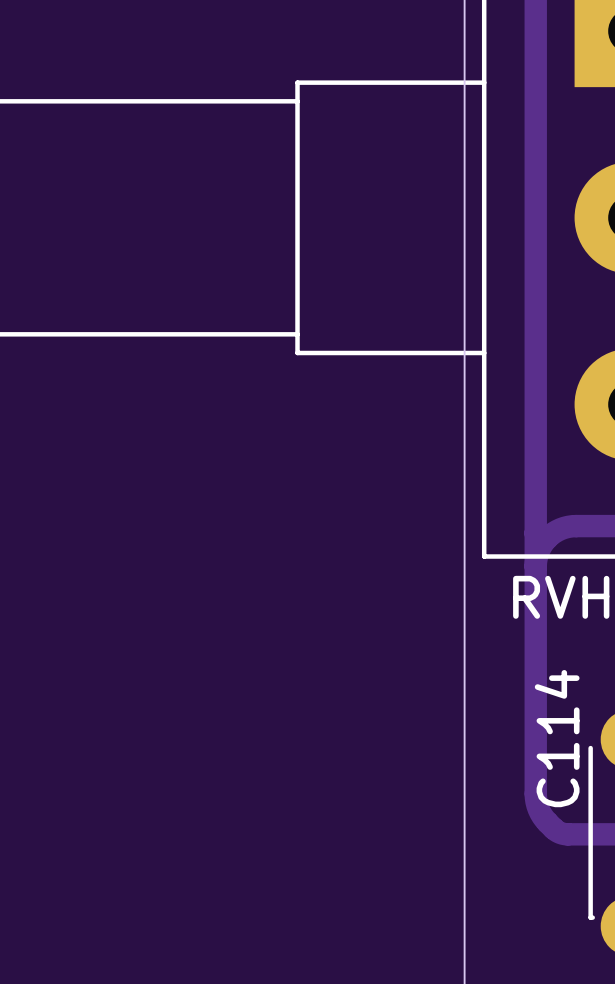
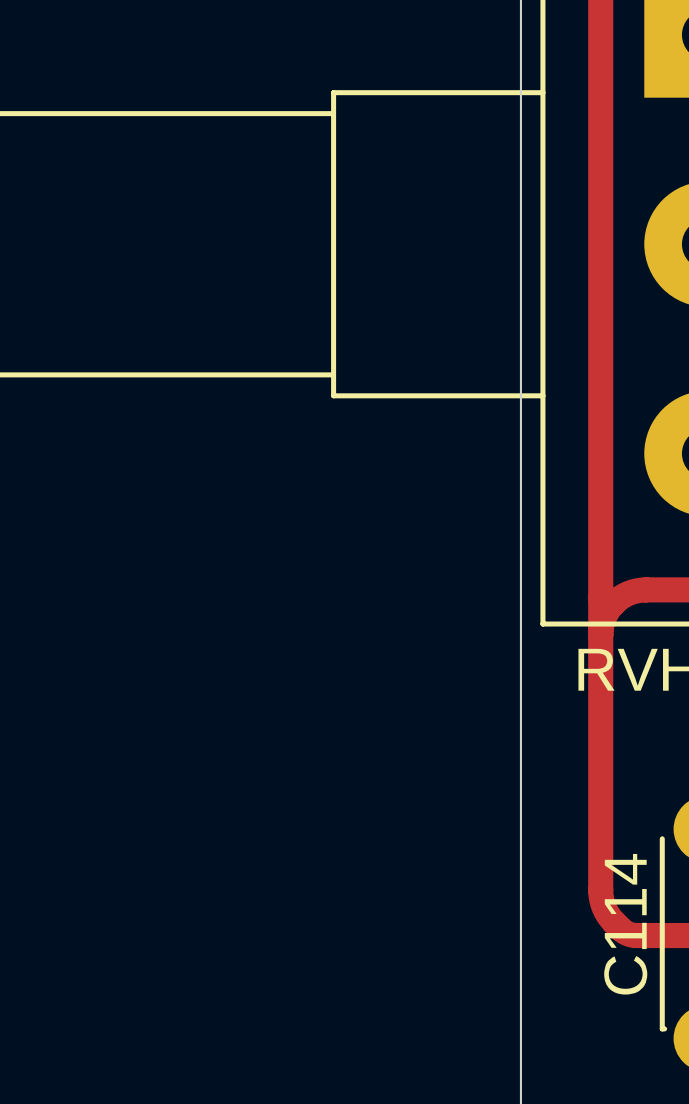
C114 name position: C114 (557, 738) -> C114 (625, 924)

